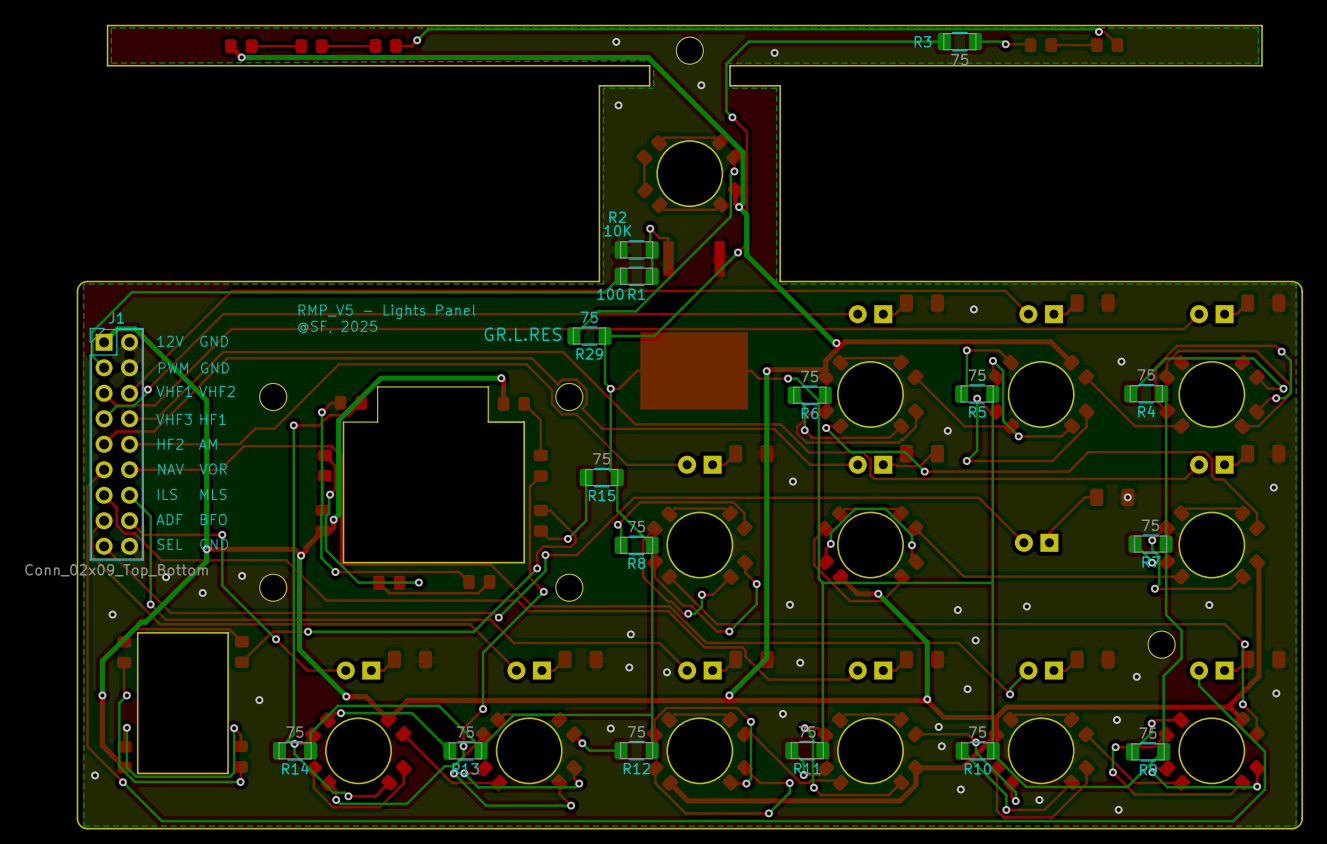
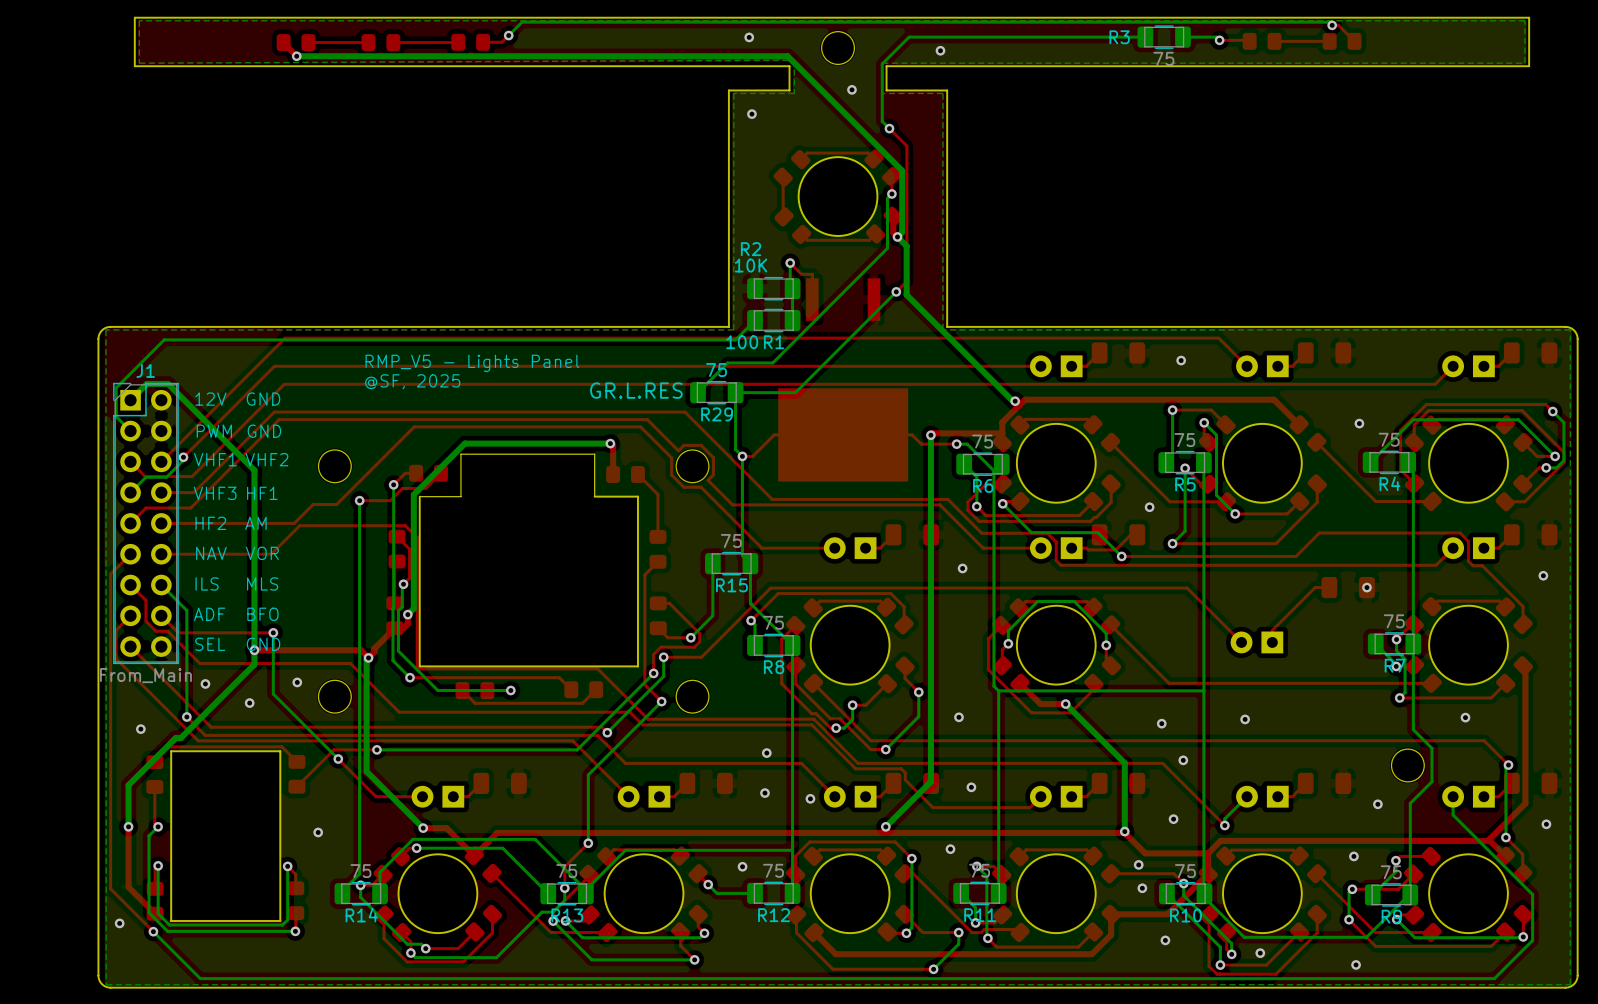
J1 value: Conn_02x09_Top_Bottom (116, 571) -> From_Main (145, 675)

